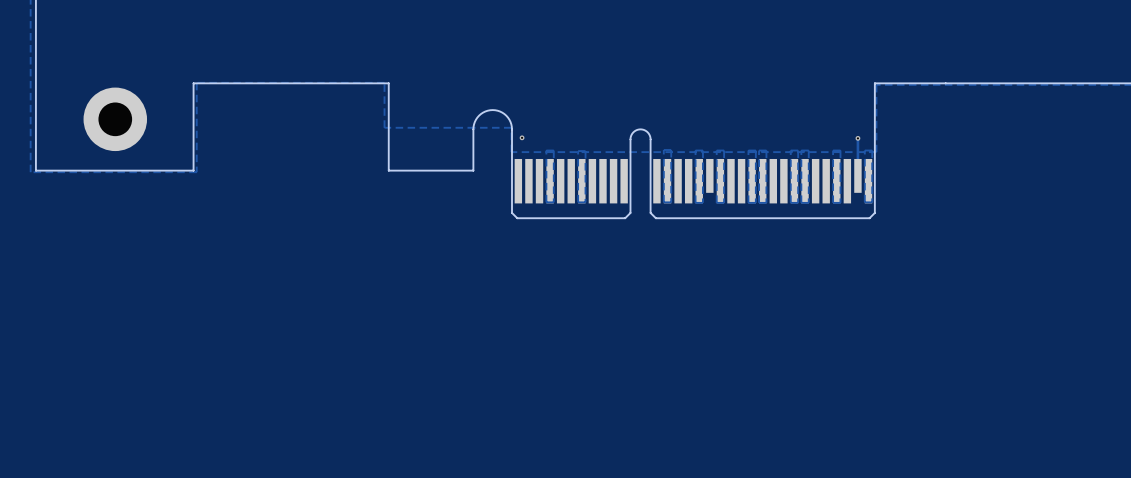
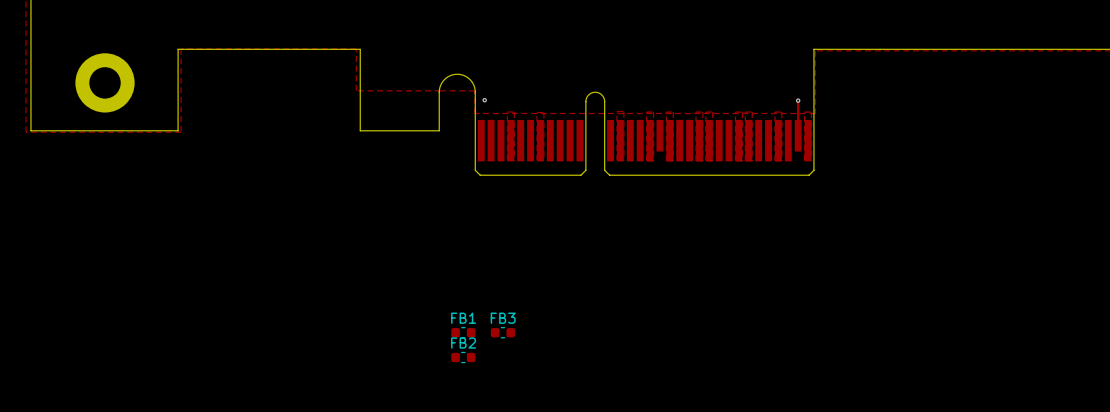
FB1: none -> (463, 332)
FB3: none -> (502, 332)
FB2: none -> (463, 357)

